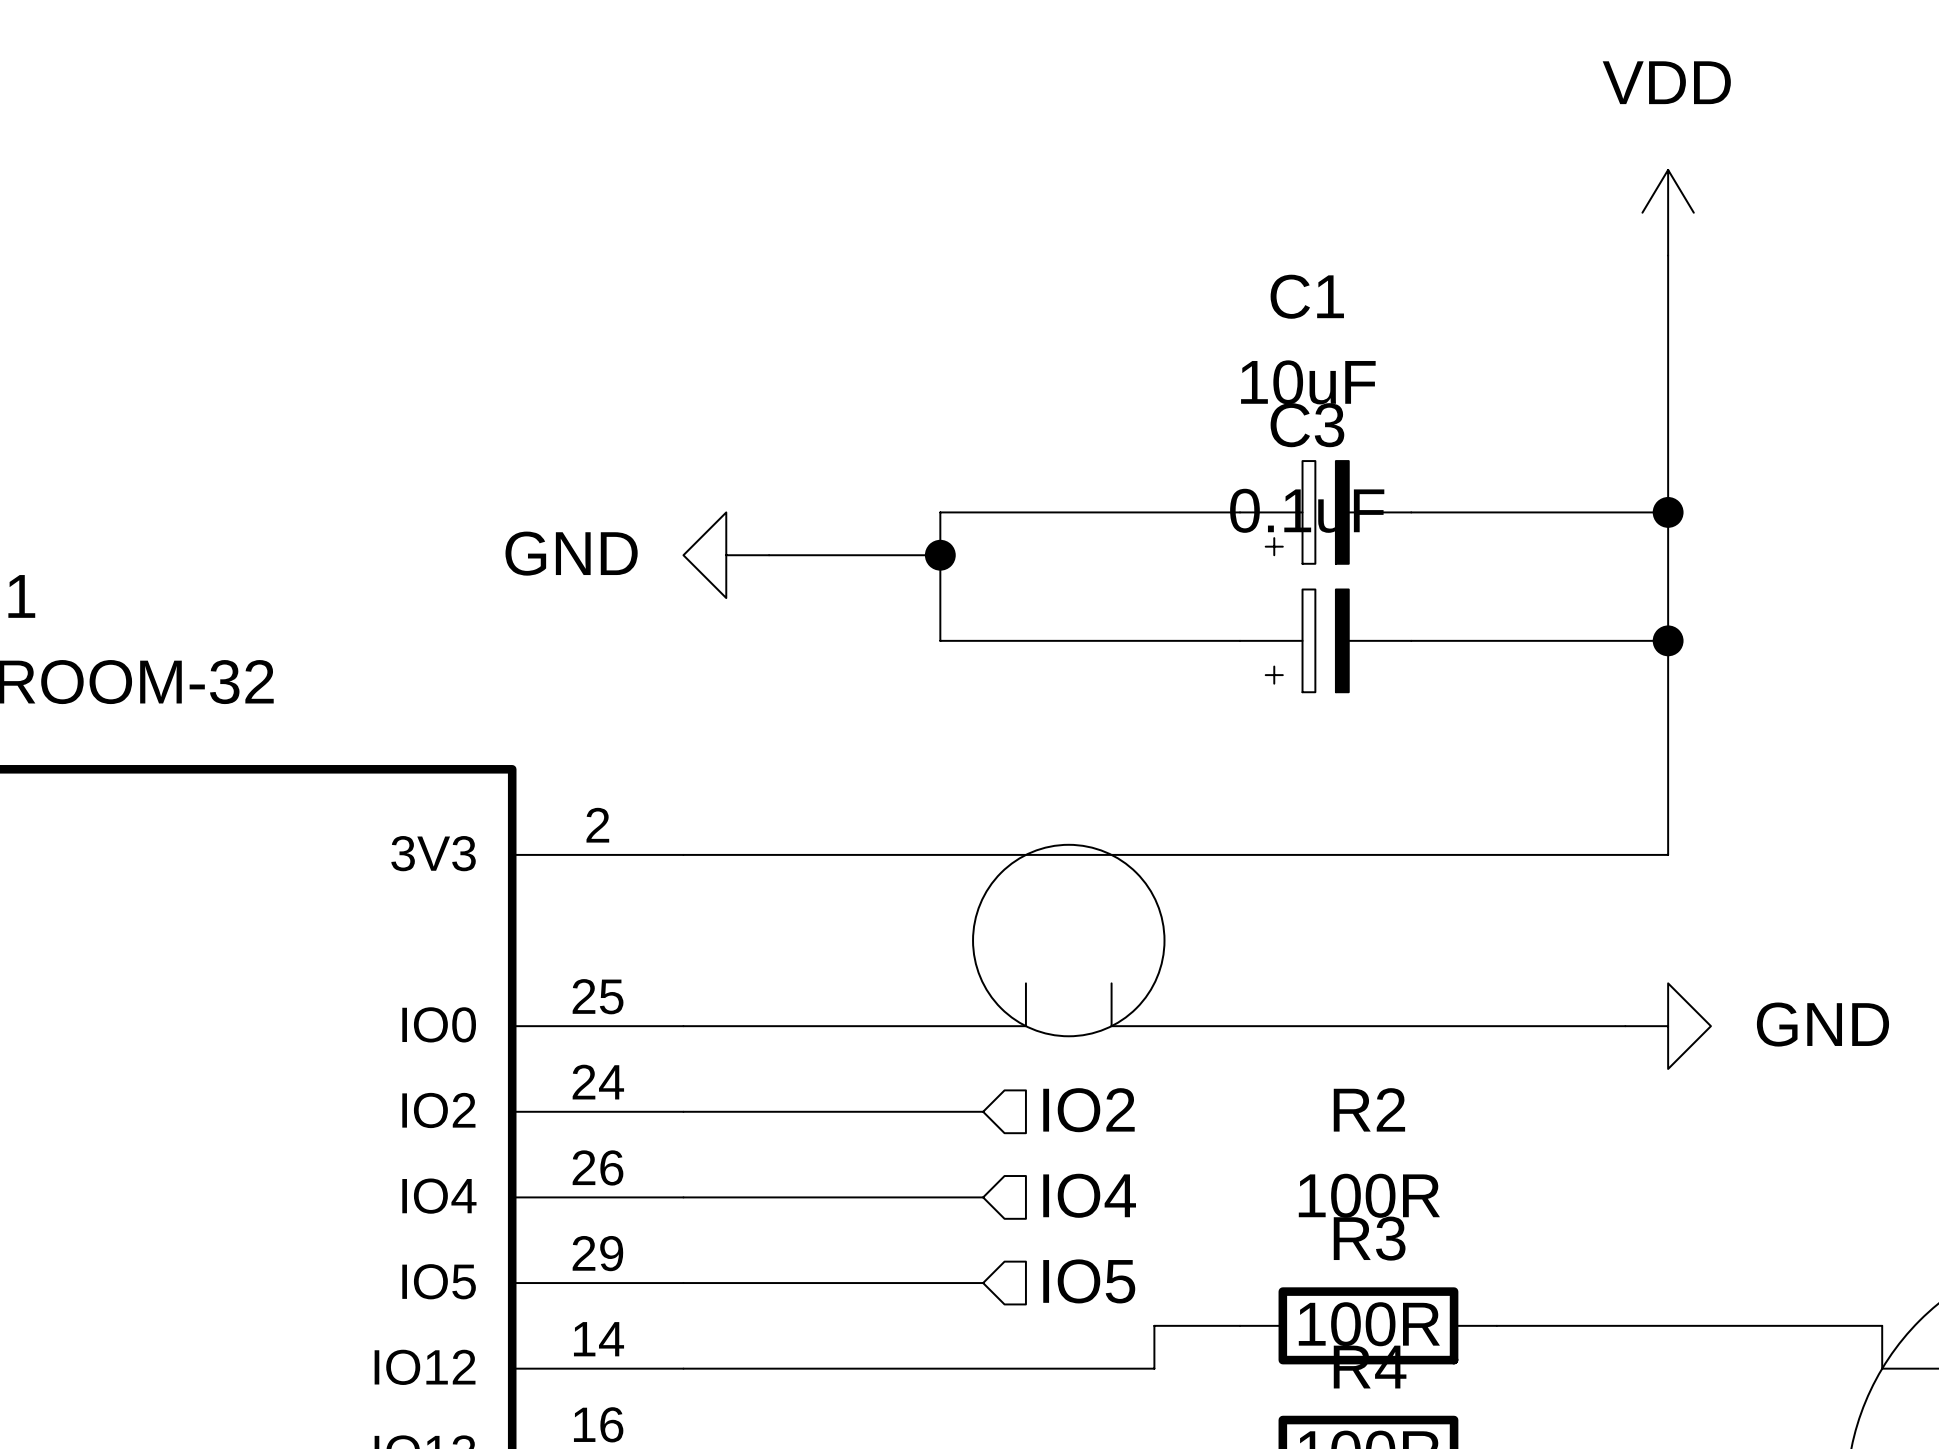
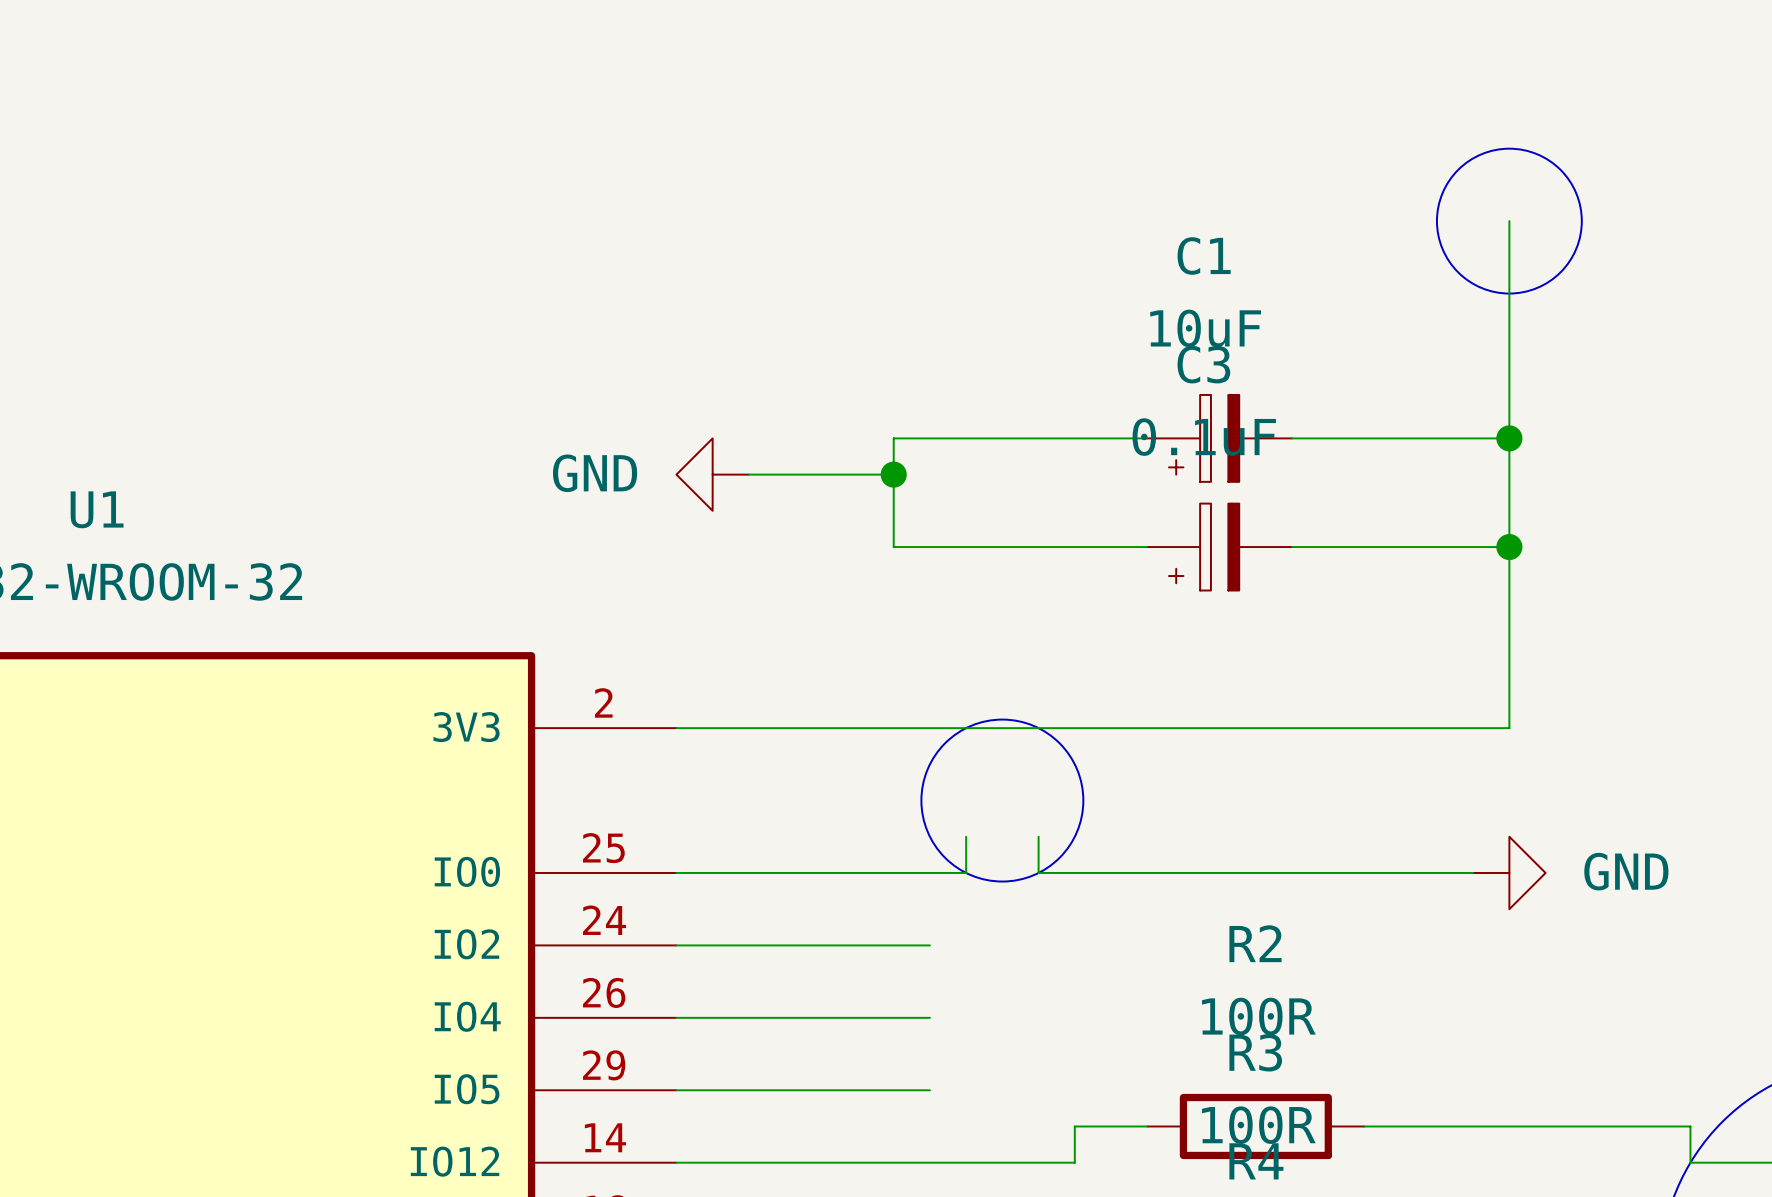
drawing: none -> [1436, 148, 1582, 294]
power symbol: VDD (1668, 212) -> none
hierarchical label: IO2 (1088, 1110) -> none
hierarchical label: IO4 (1089, 1195) -> none
hierarchical label: IO5 (1089, 1281) -> none

